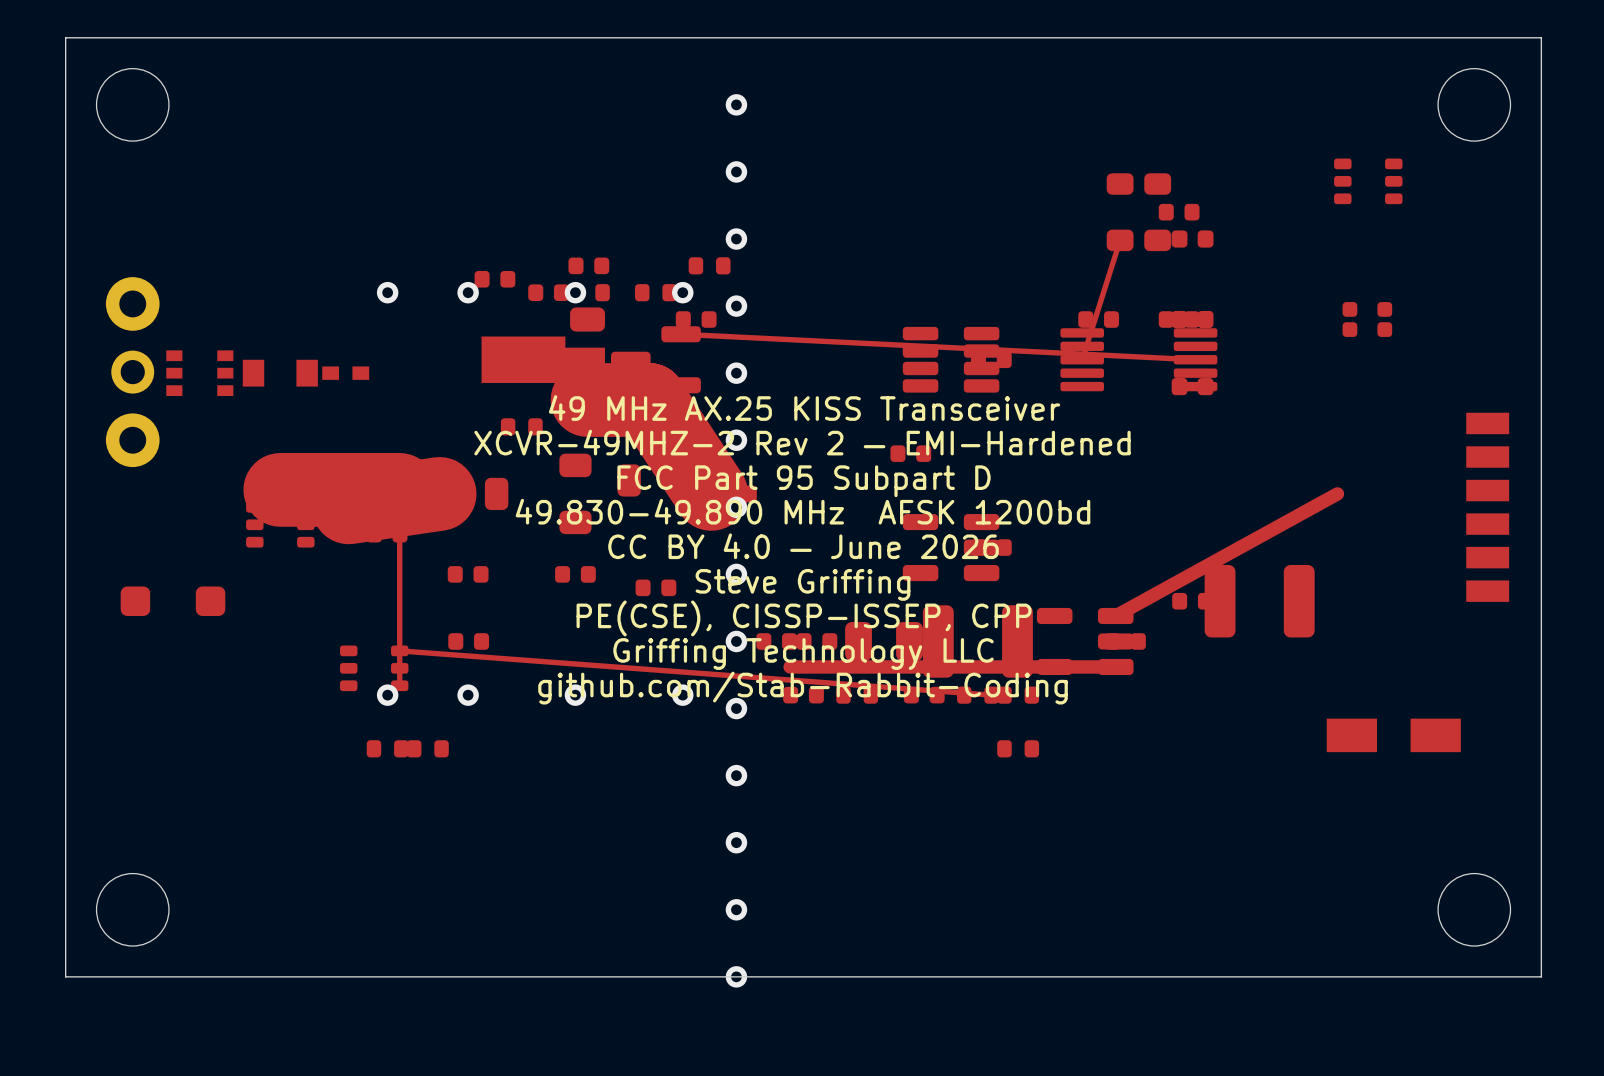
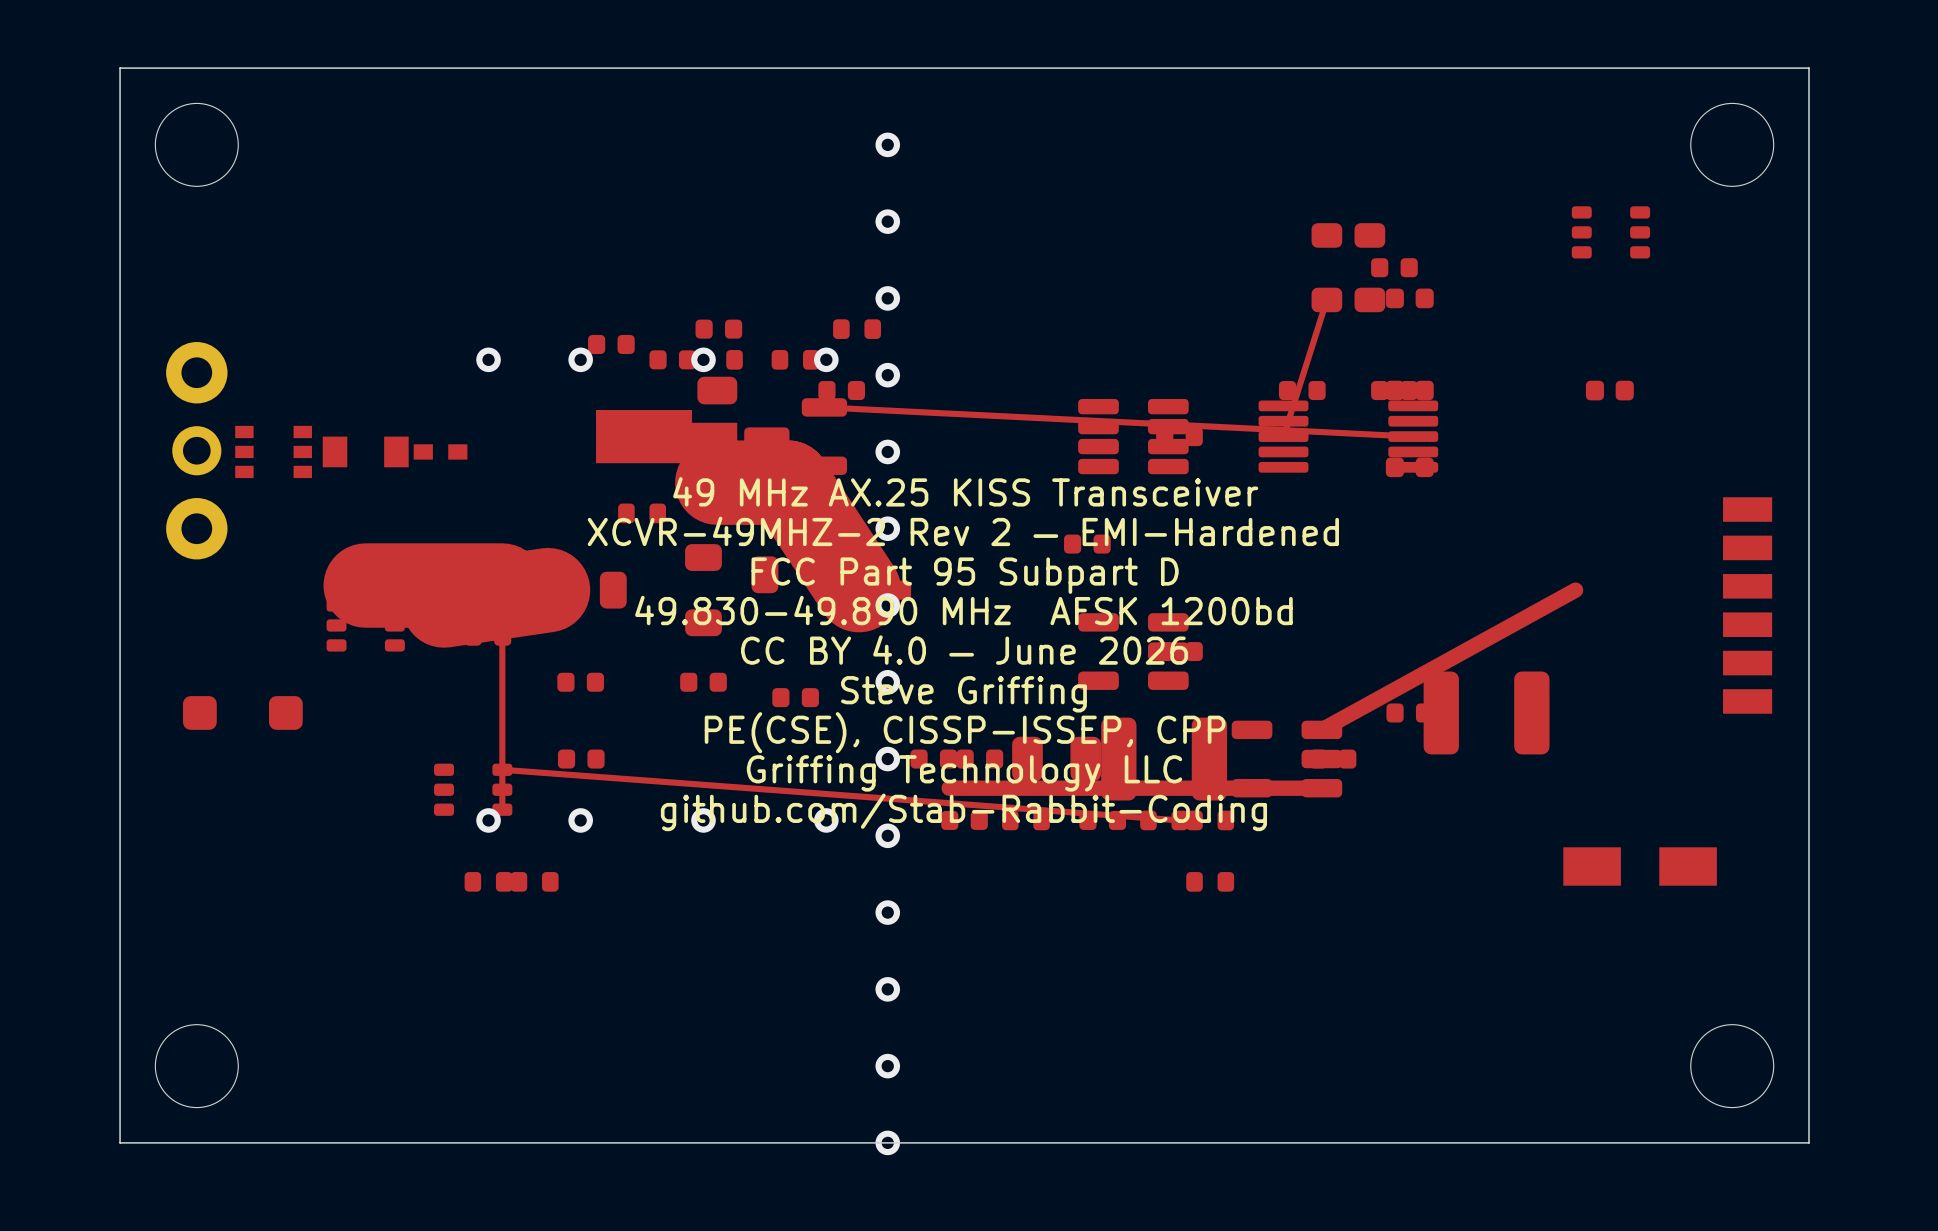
part footprint: [1342, 302, 1393, 337] -> [1585, 380, 1634, 401]

